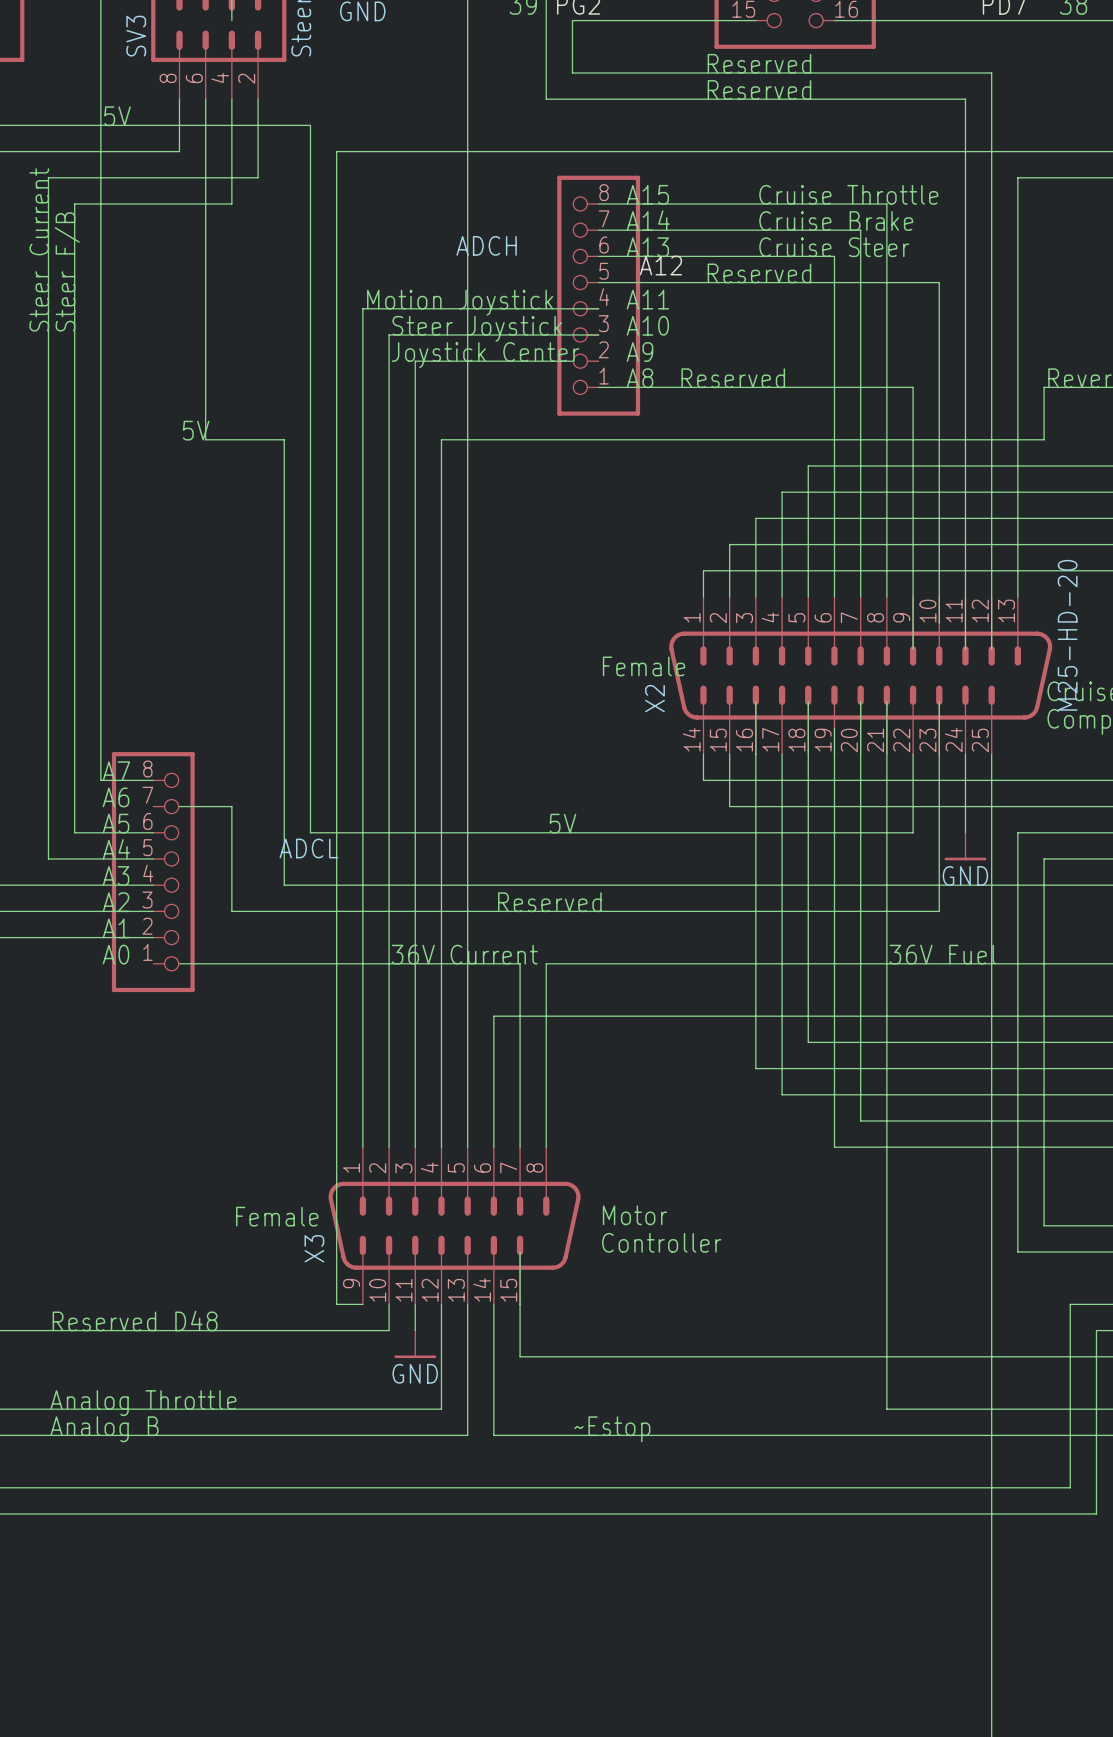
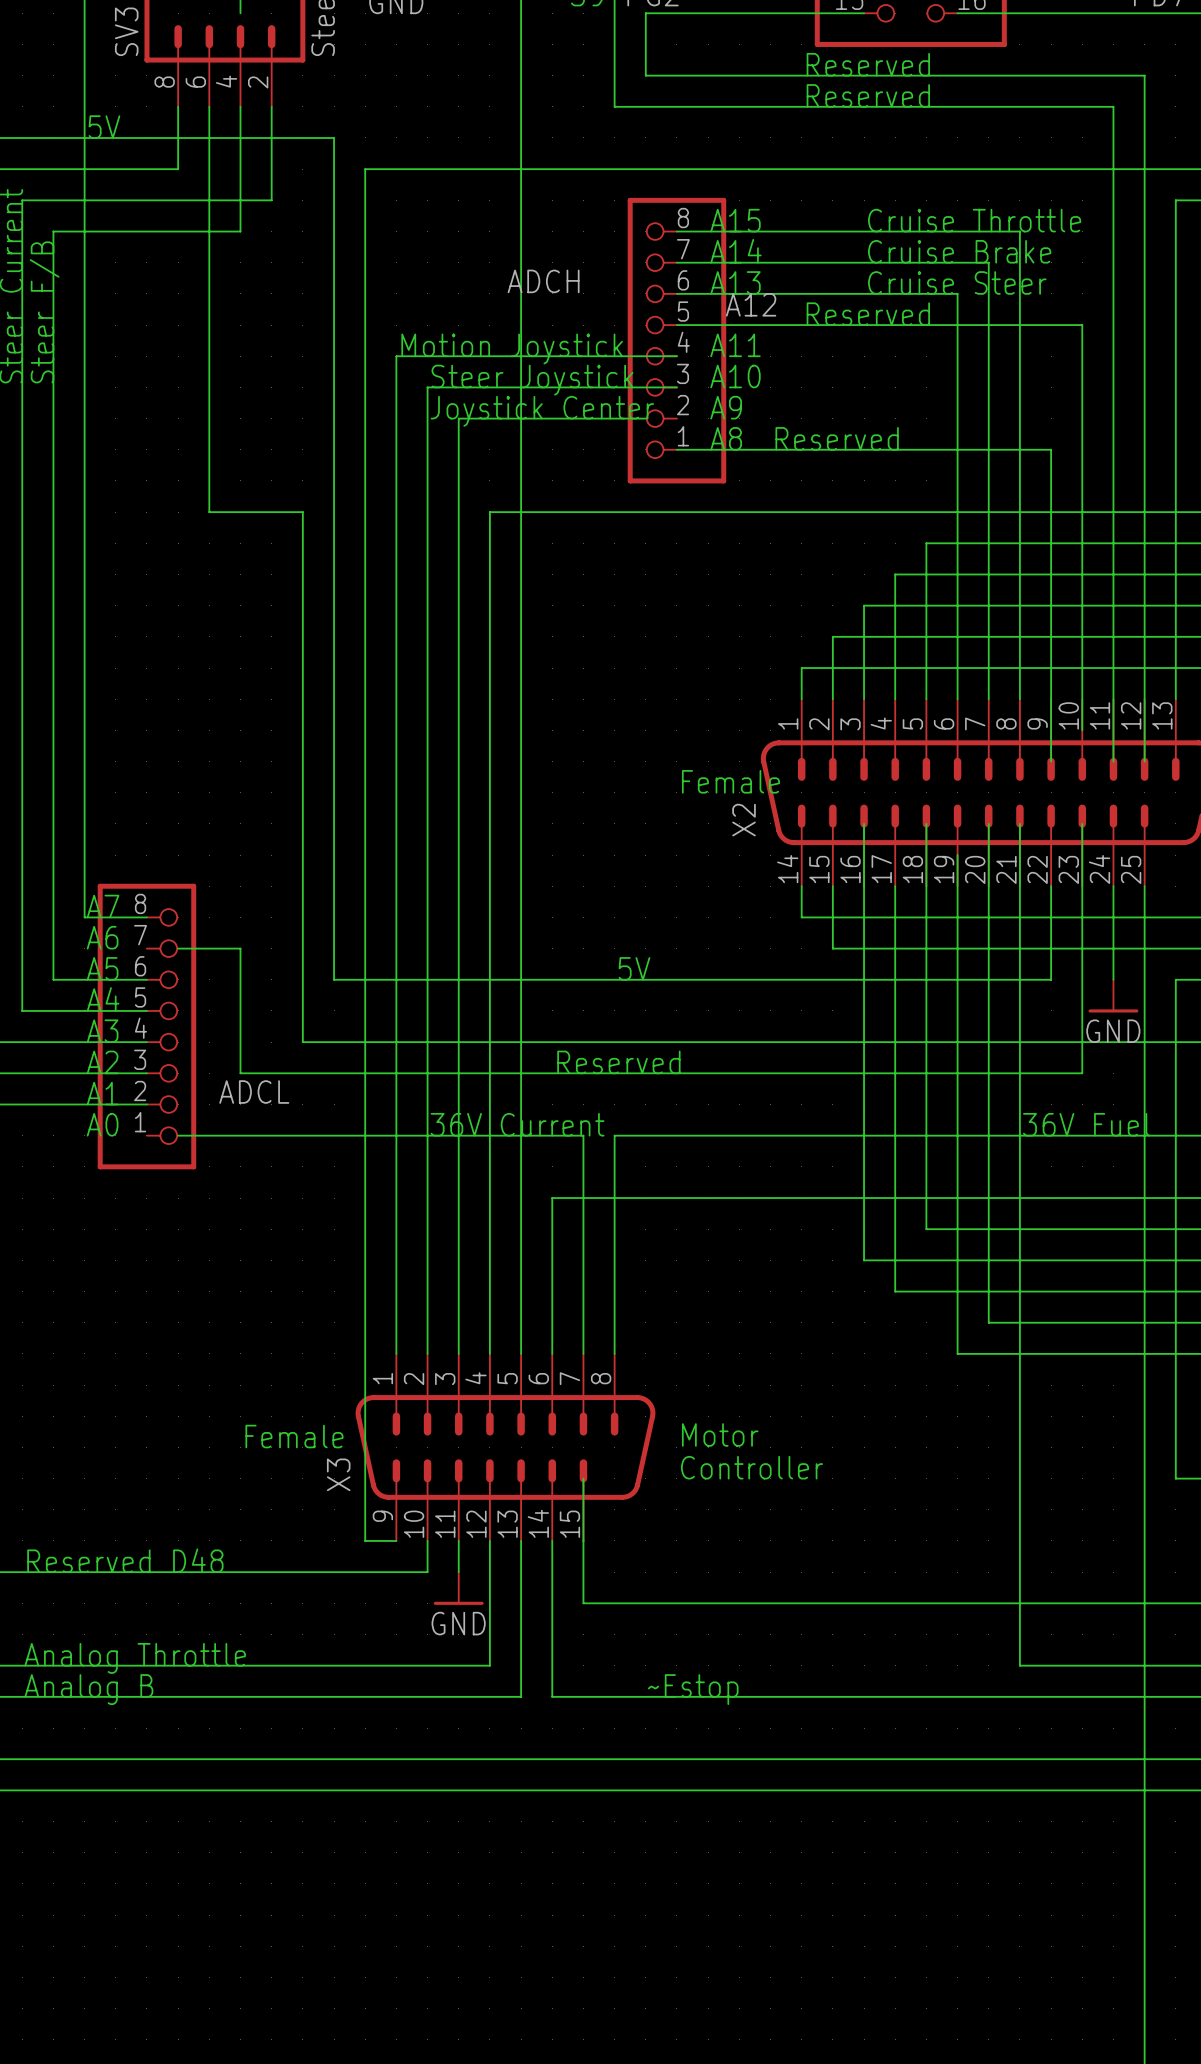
text: 5V (196, 430) -> none
ADCL name position: ADCL (308, 848) -> ADCL (254, 1092)

